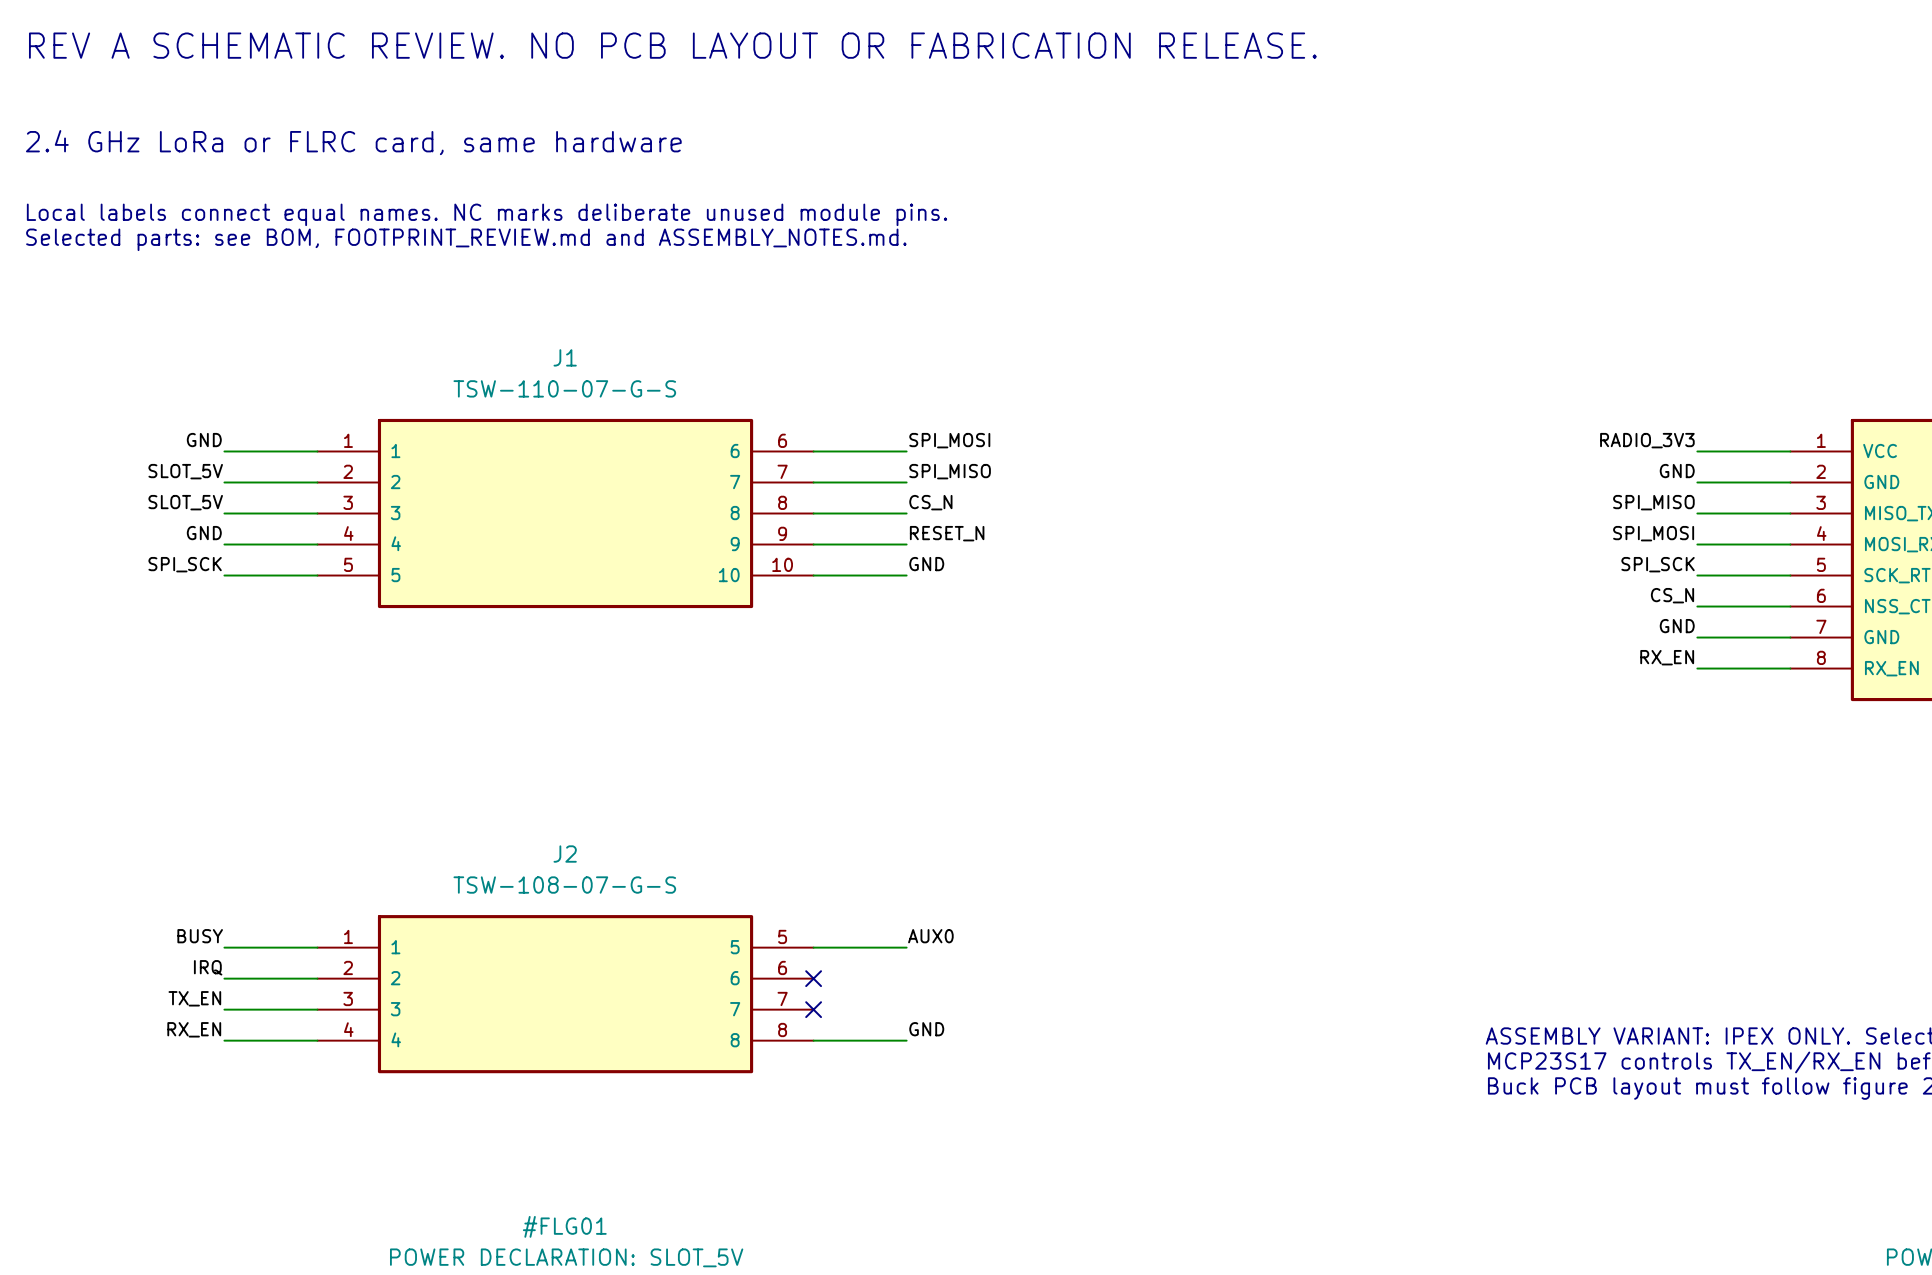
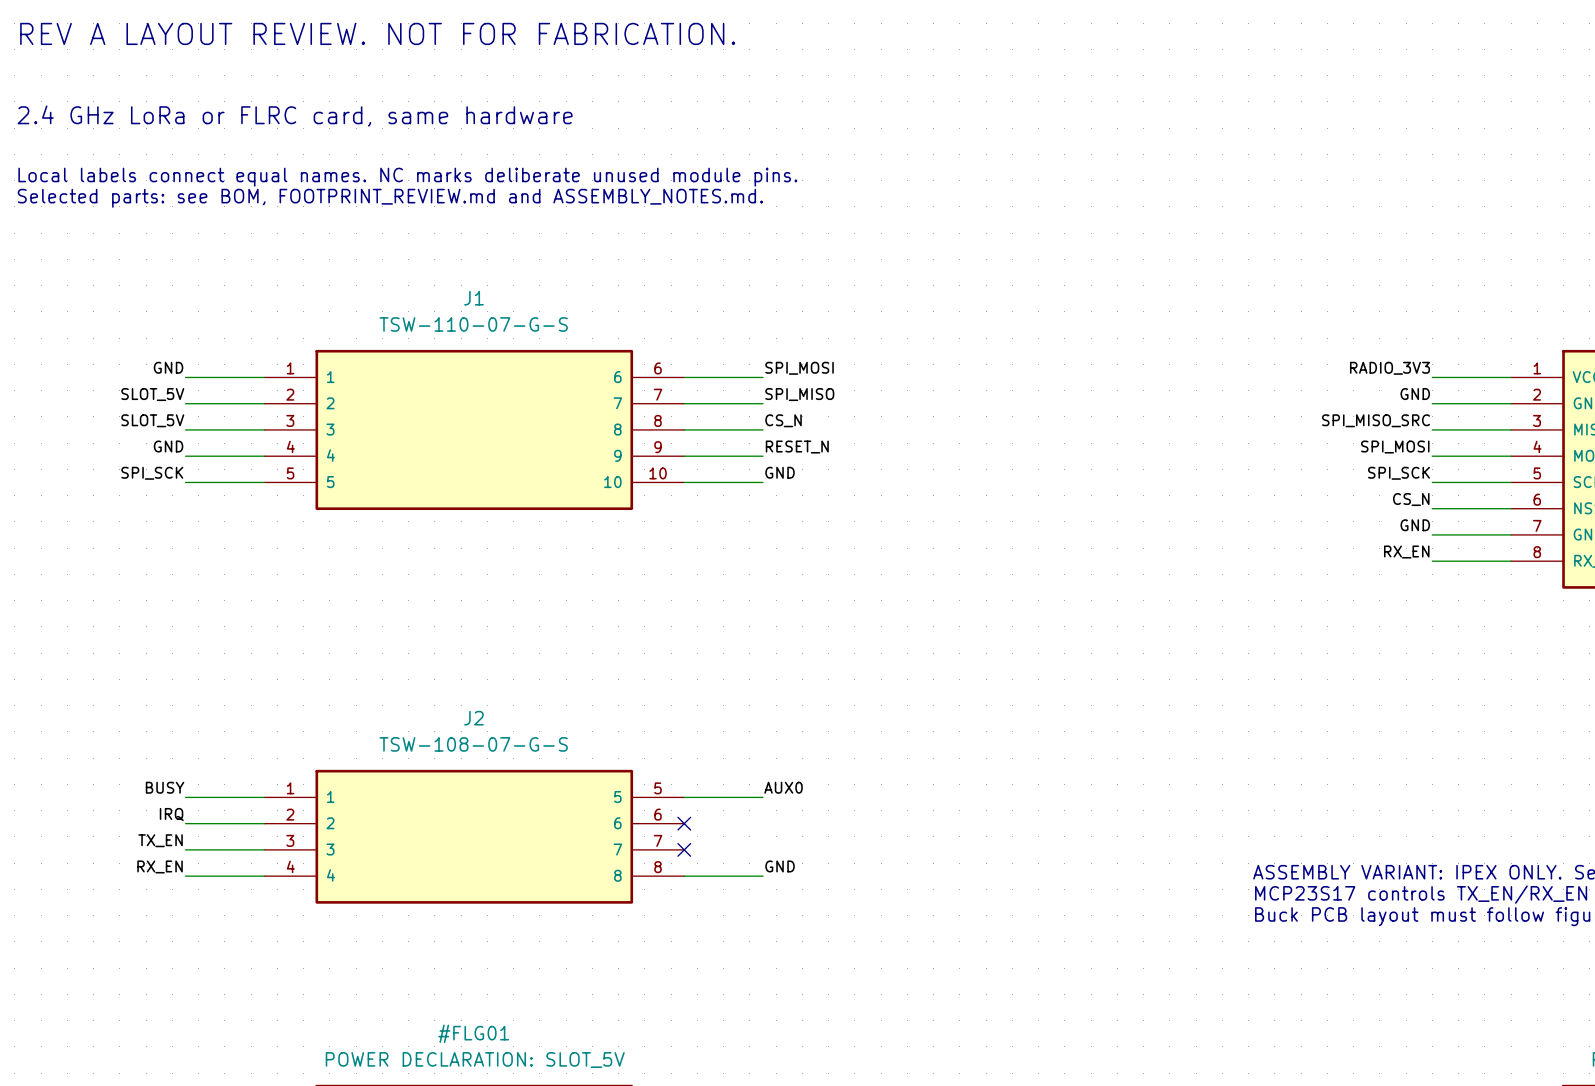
text: REV A SCHEMATIC REVIEW. NO PCB LAYOUT OR FABRICATION RELEASE. (672, 45) -> REV A LAYOUT REVIEW. NOT FOR FABRICATION. (377, 33)
label: SPI_MISO (1653, 502) -> SPI_MISO_SRC (1376, 420)

